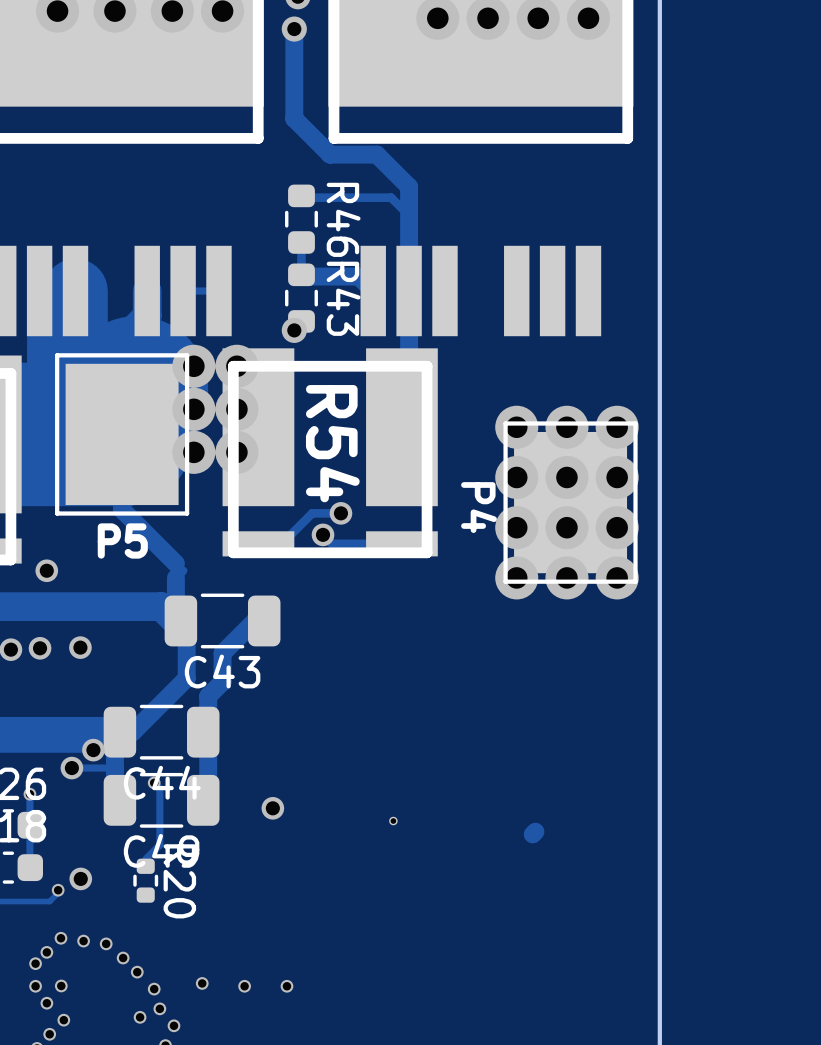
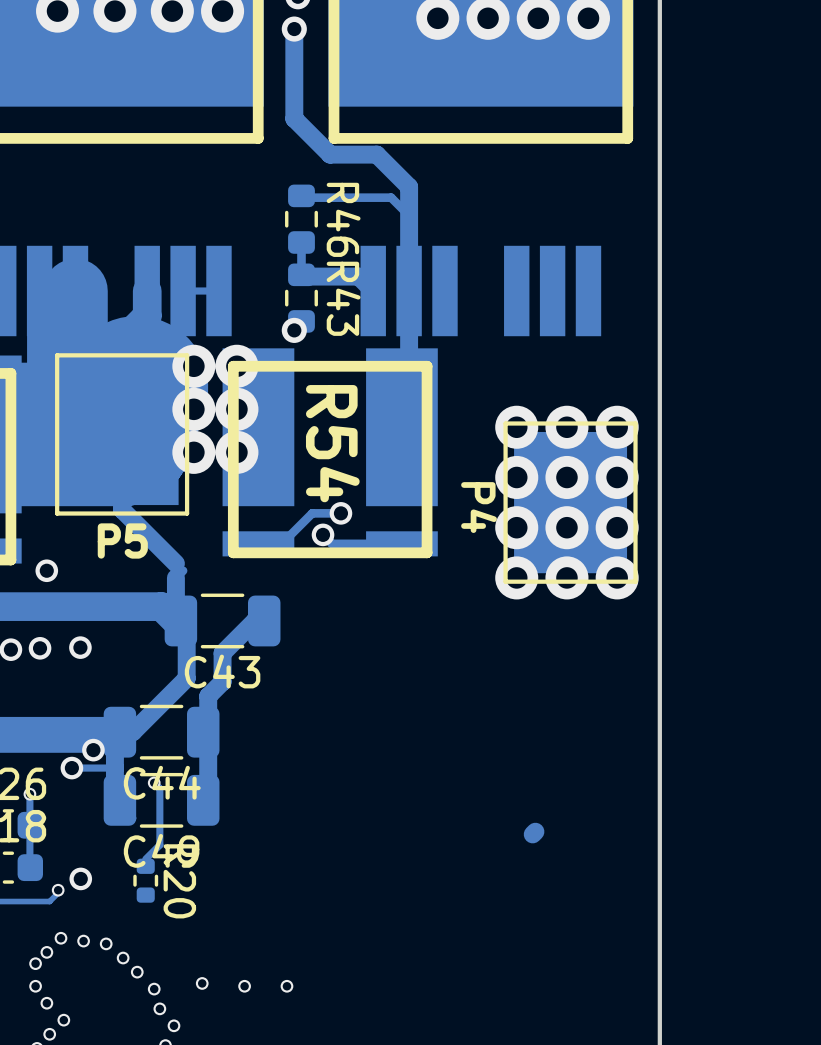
via: (272, 808) -> none
part: (393, 821) -> none
via: (61, 985) -> none
via: (140, 1017) -> none

